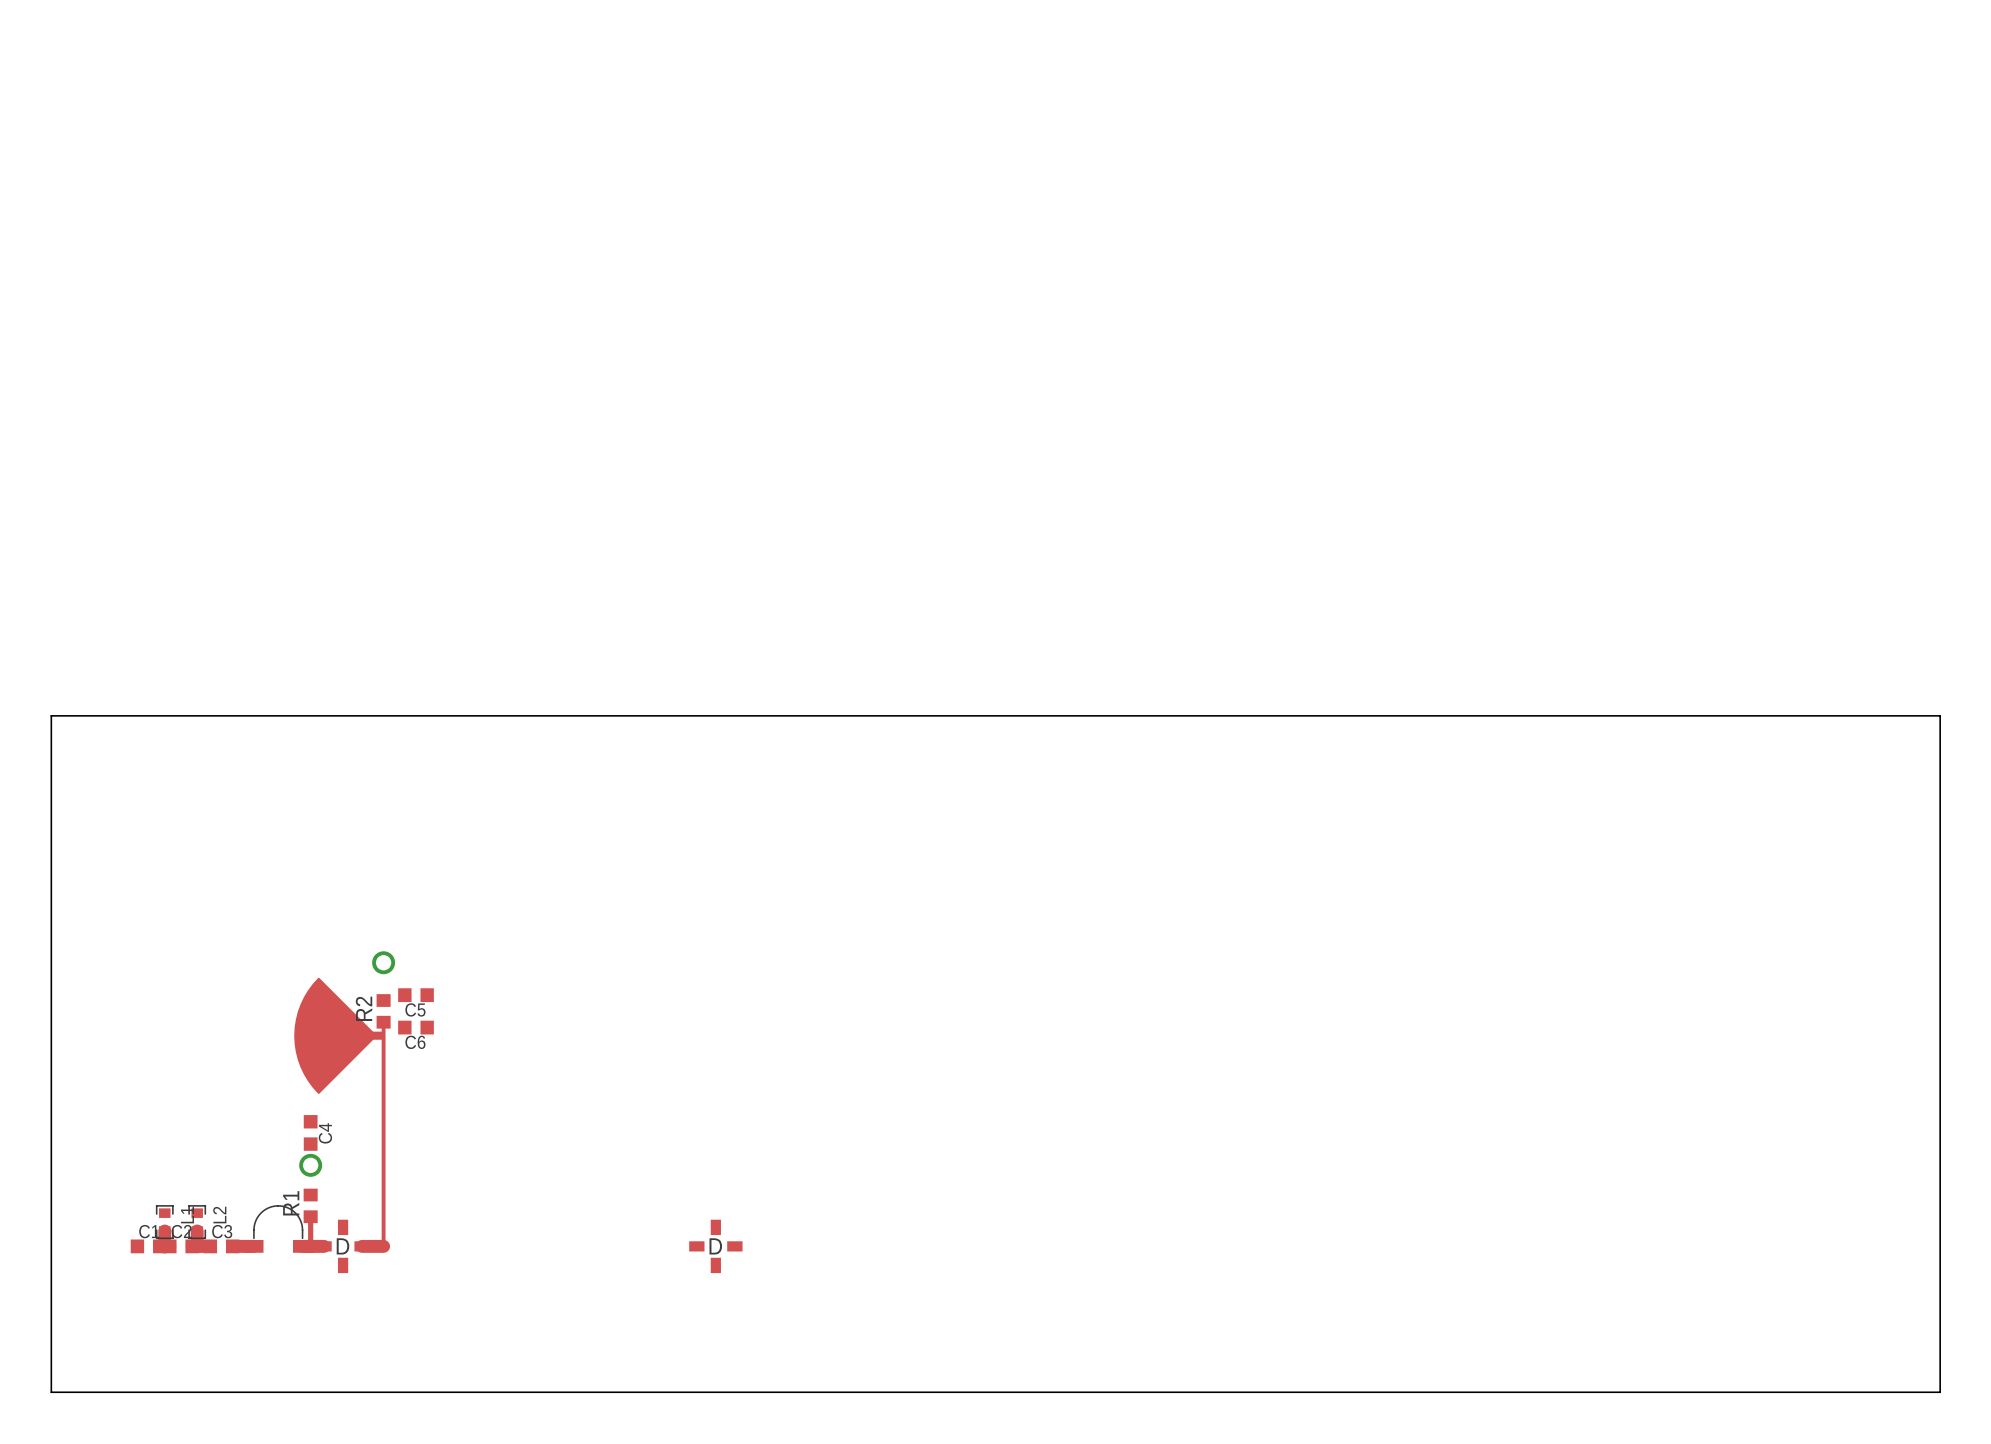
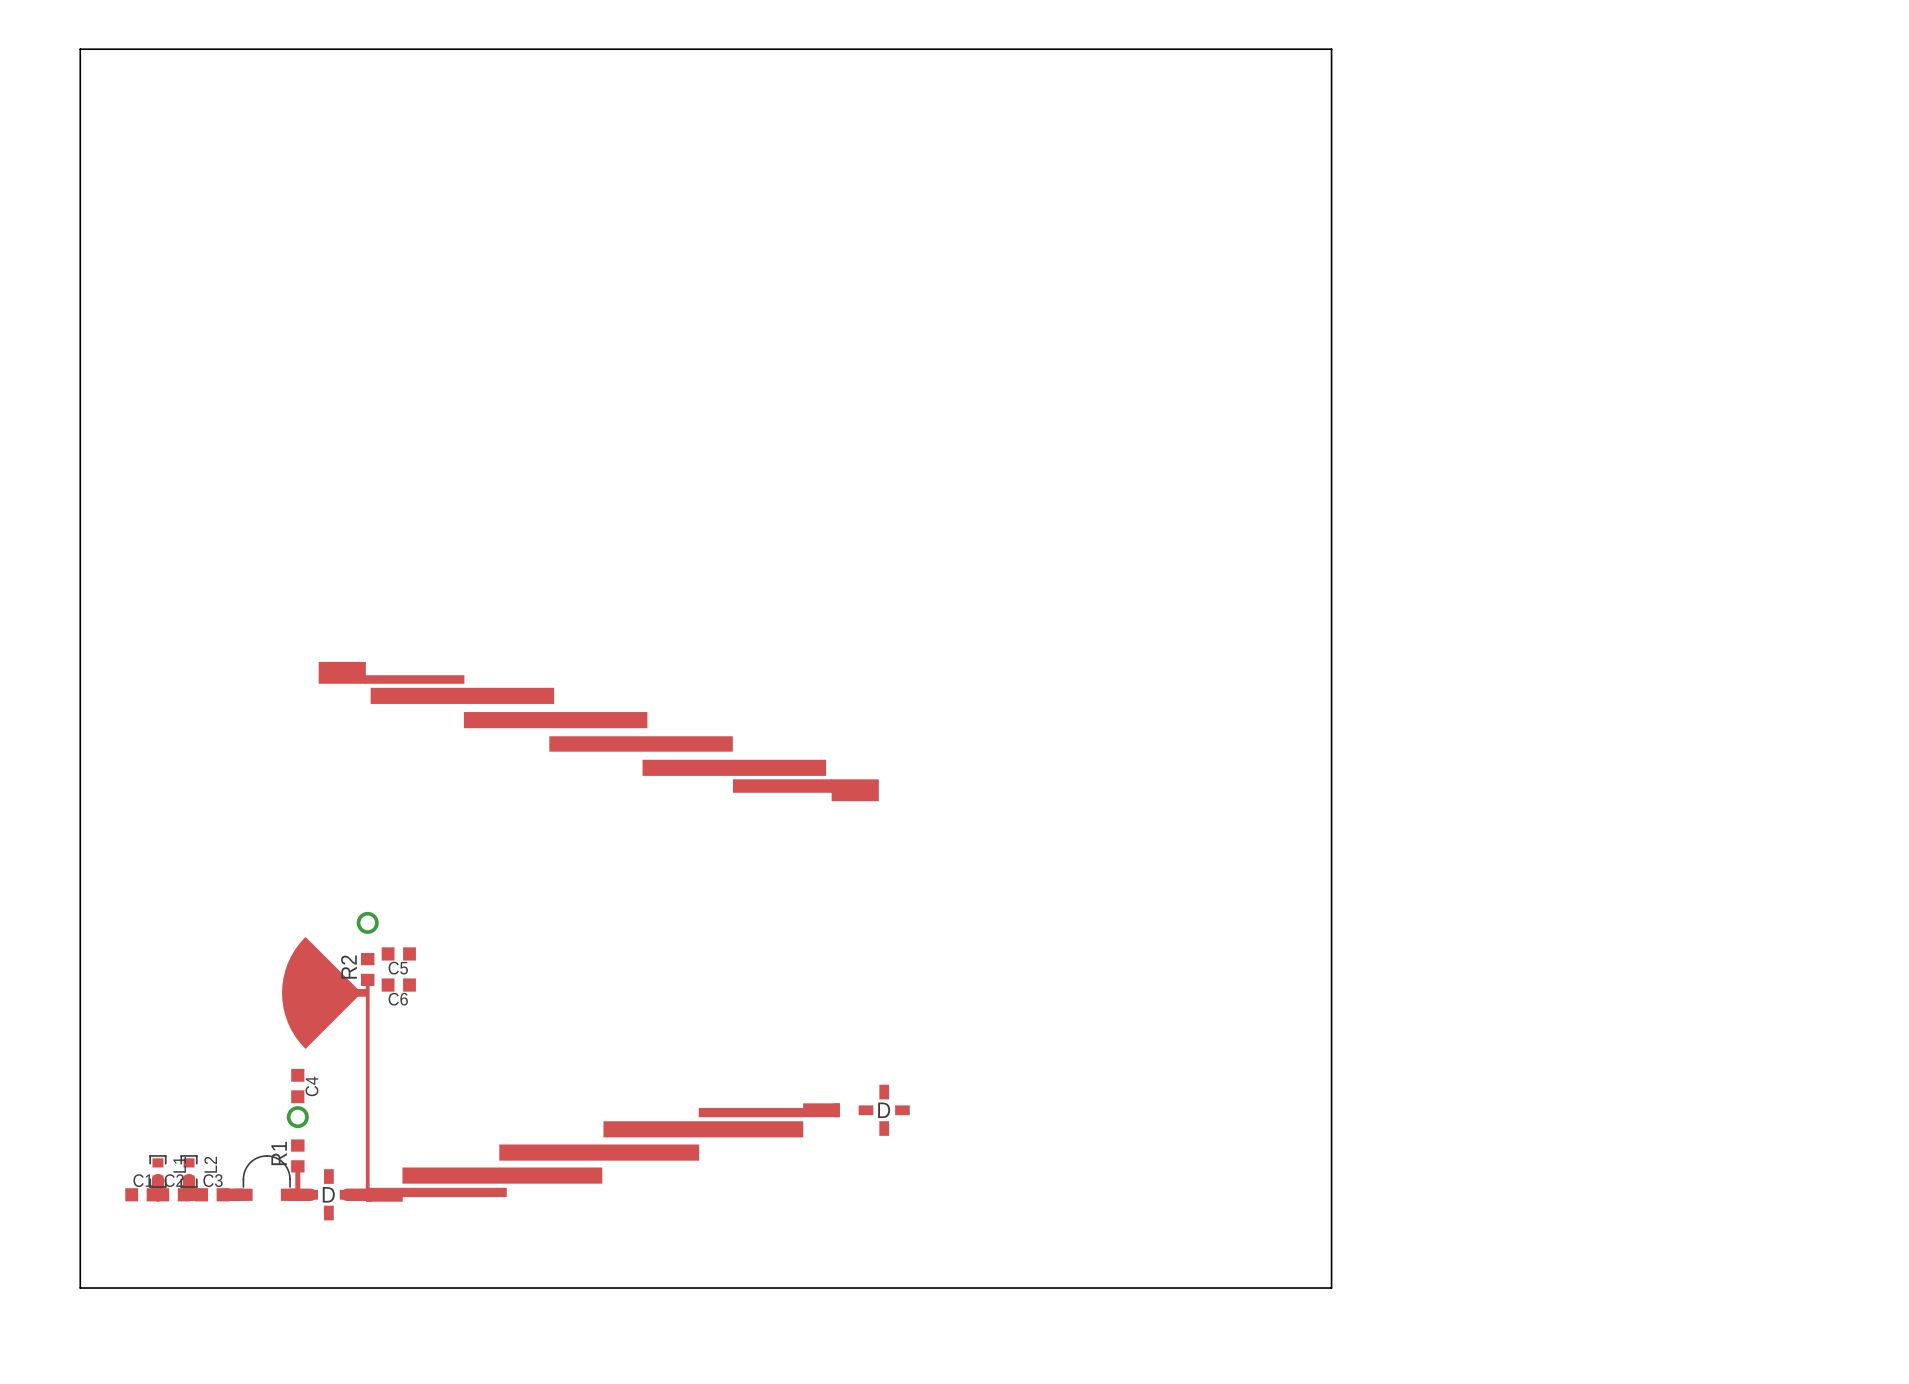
board edge: none -> (80, 49) (1331, 49) (1331, 1288) (80, 1288) (80, 49)
board edge: (51, 715) (1940, 715) (1940, 1392) (51, 1392) (51, 715) -> none
part: none -> (598, 731)
part: none -> (602, 1152)
part position: (715, 1246) -> (884, 1110)

